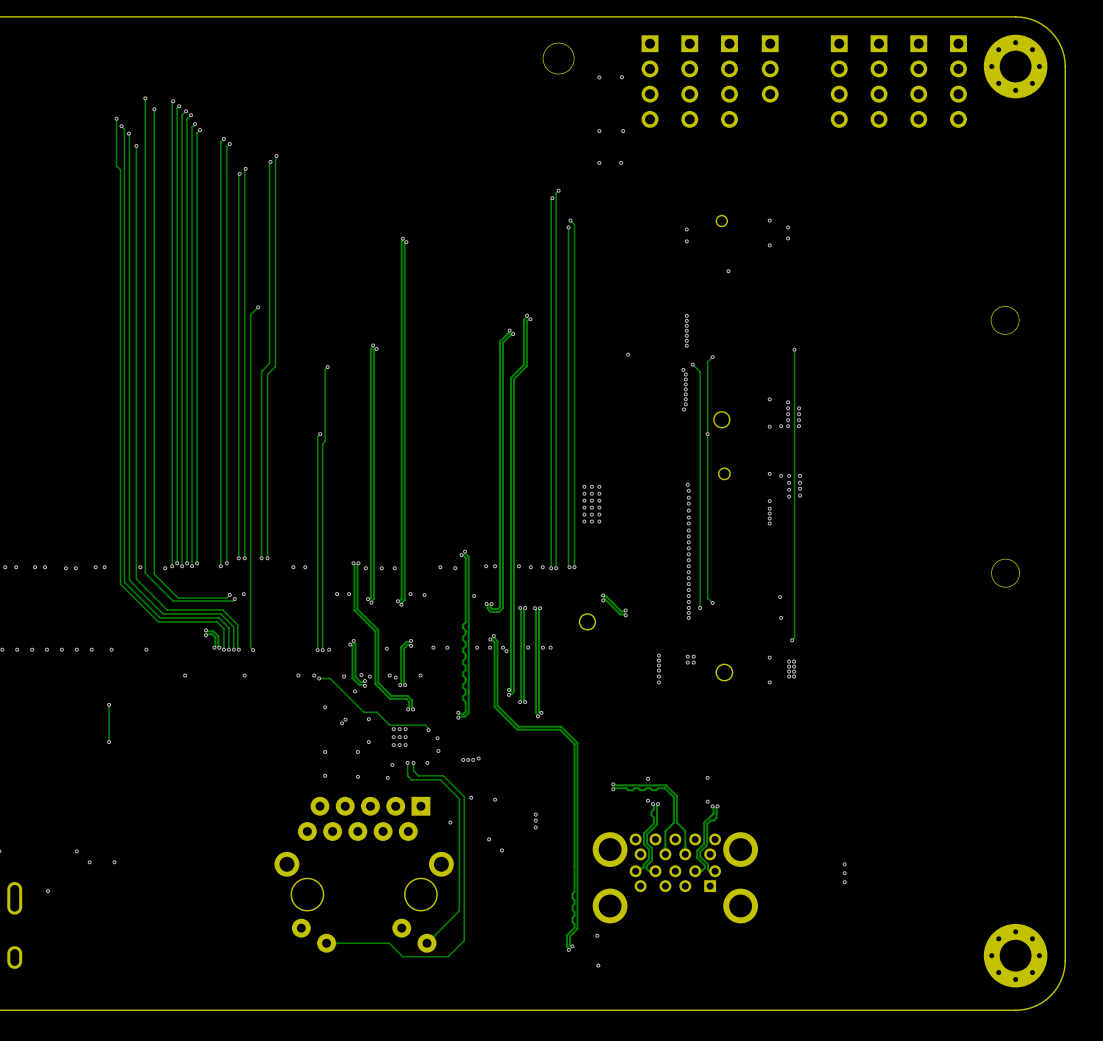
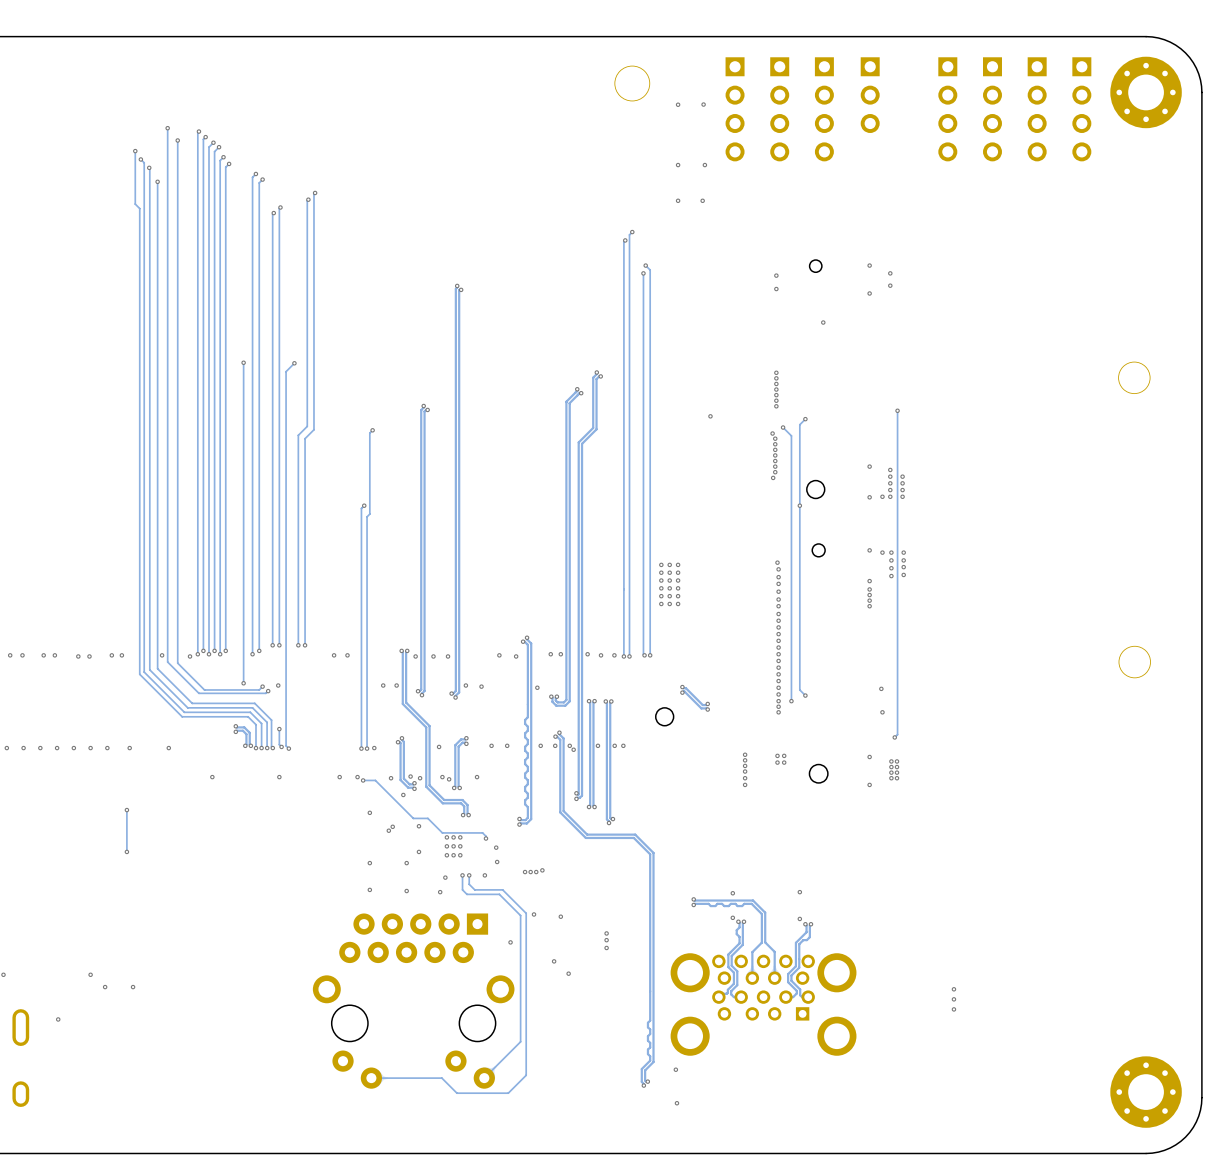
track: none -> (243, 362) (243, 683)
via: none -> (243, 362)
via: none -> (243, 683)
track: none -> (279, 729) (279, 744) (281, 746)
via: none -> (279, 729)
via: none -> (281, 746)

